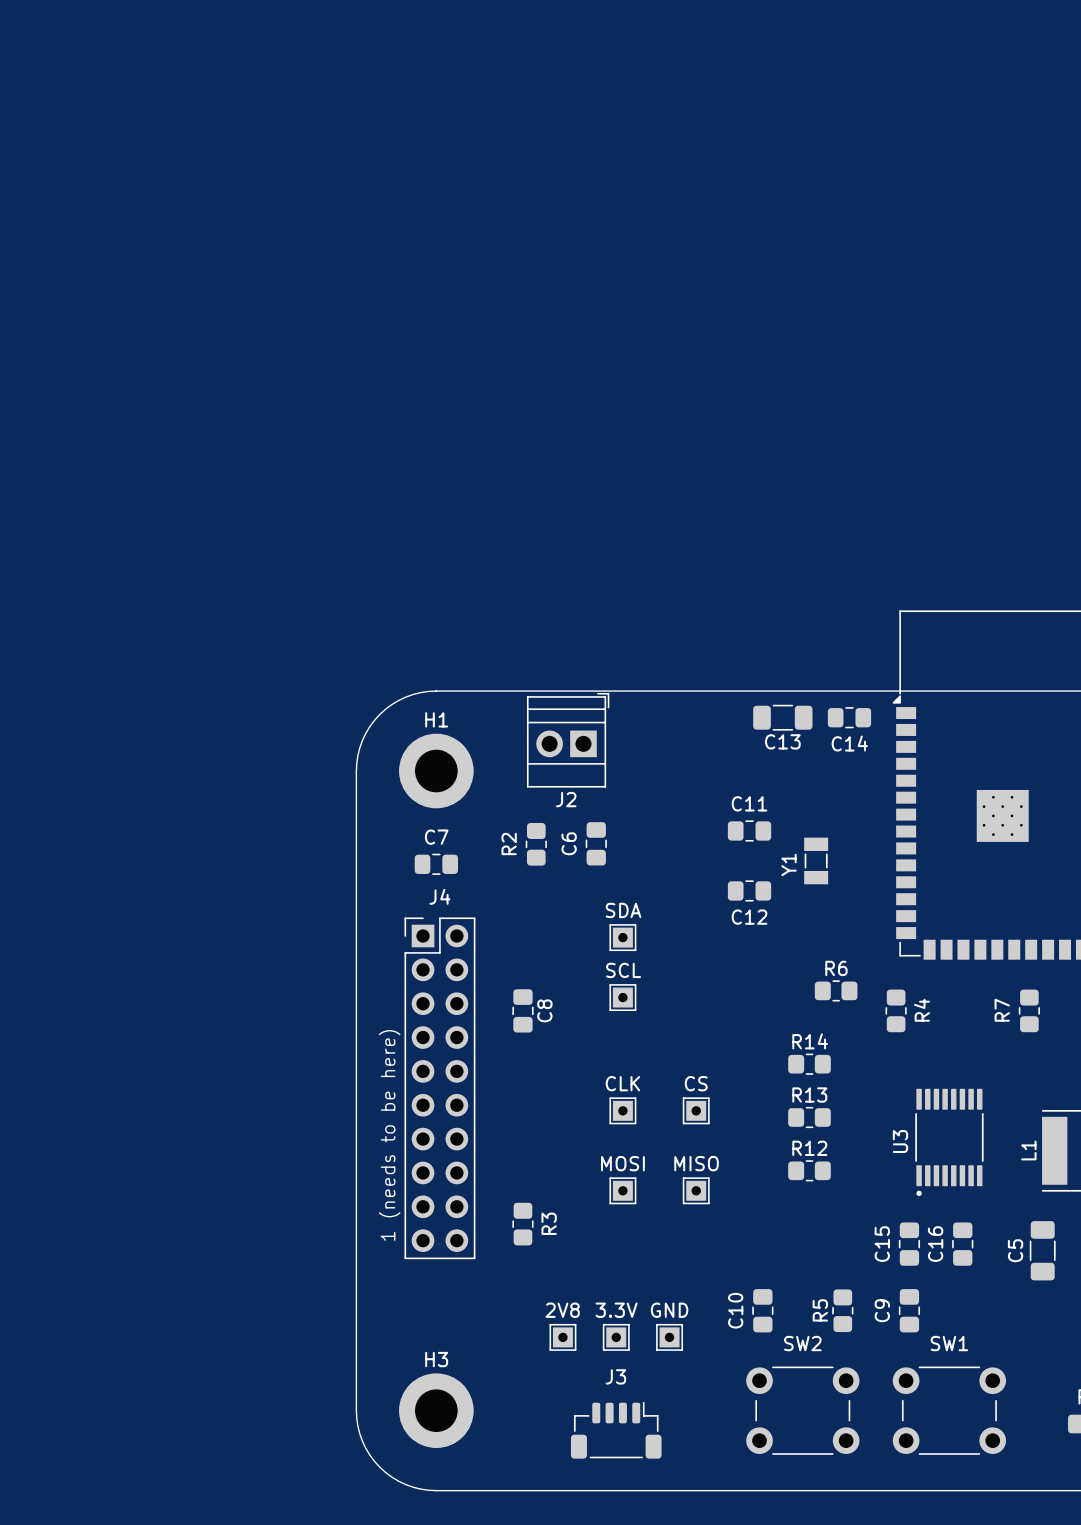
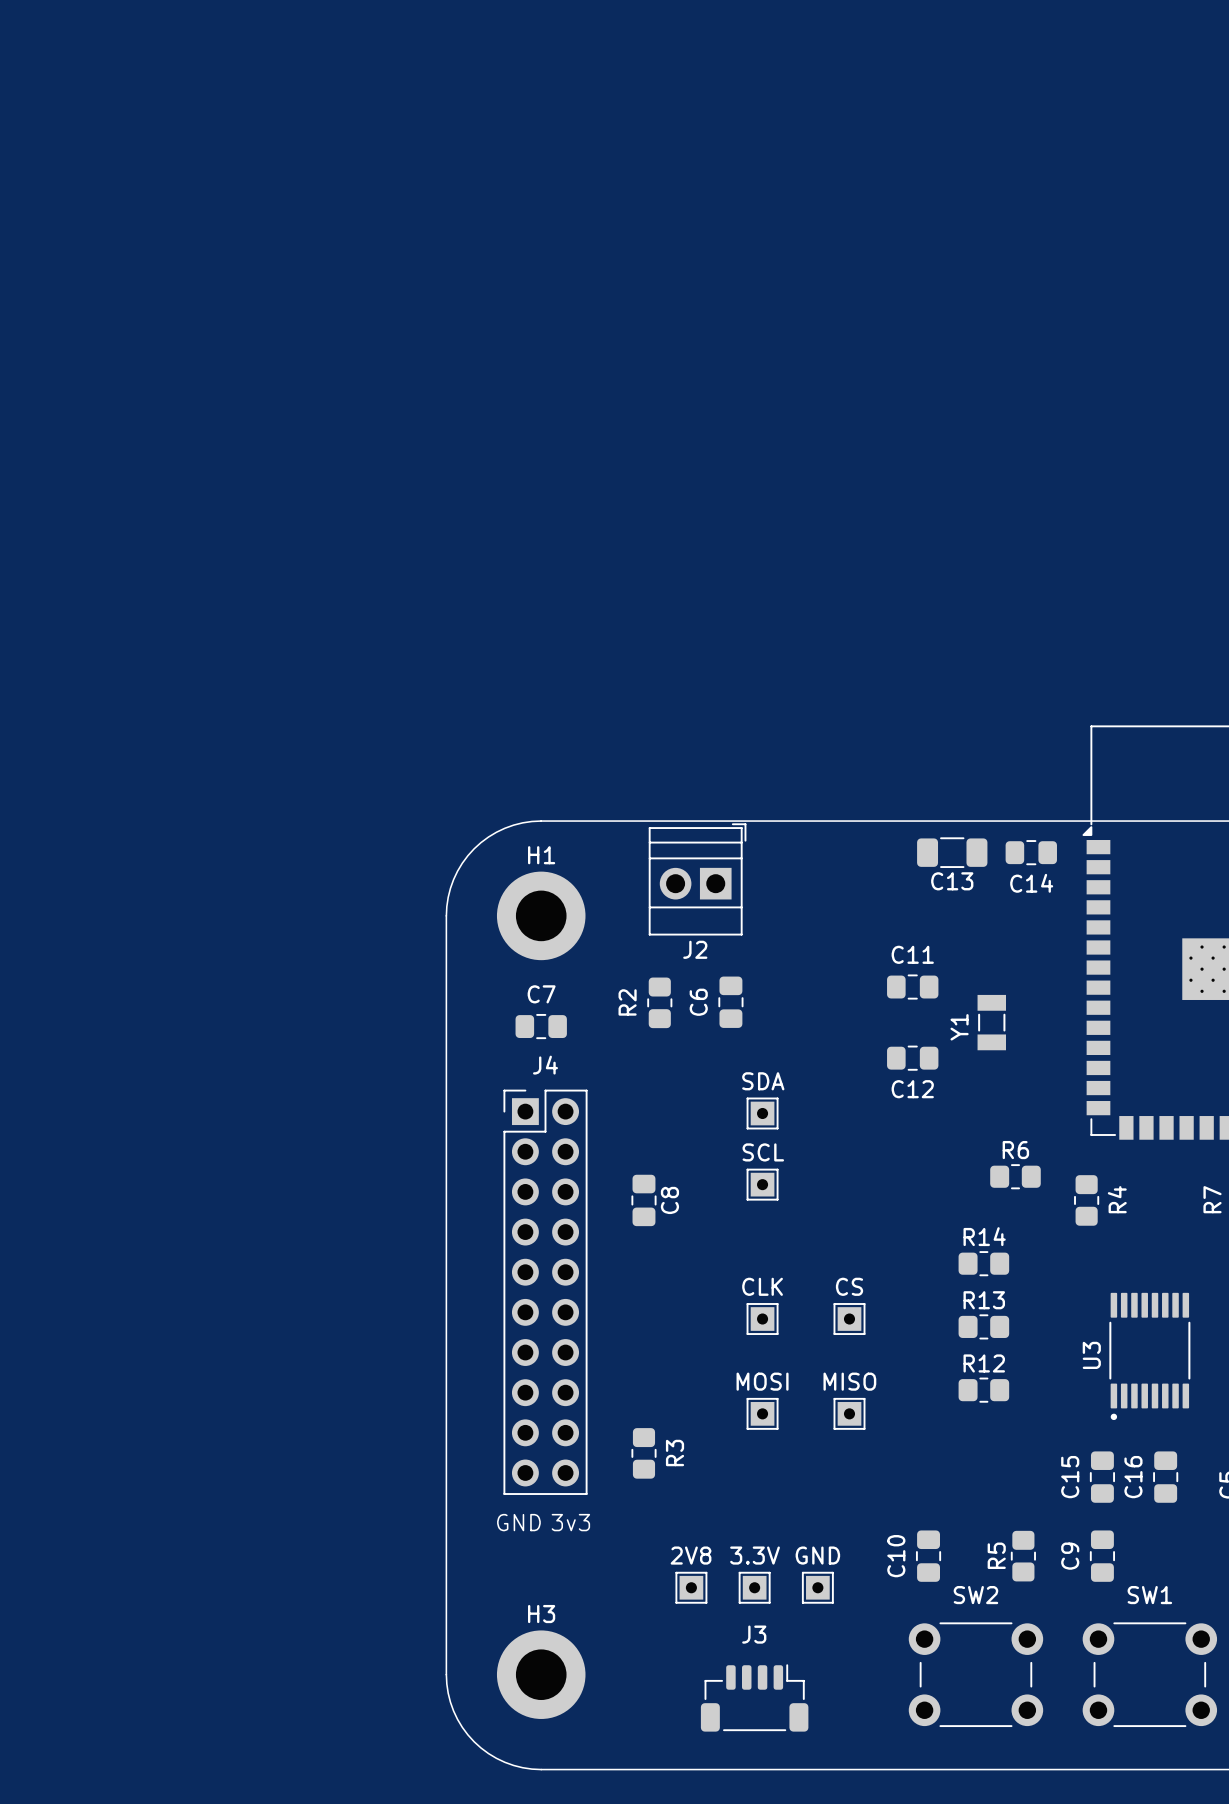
text: 1 (needs to be here) (389, 1135) -> none
text: none -> GND (518, 1522)
text: none -> 3v3 (570, 1522)

